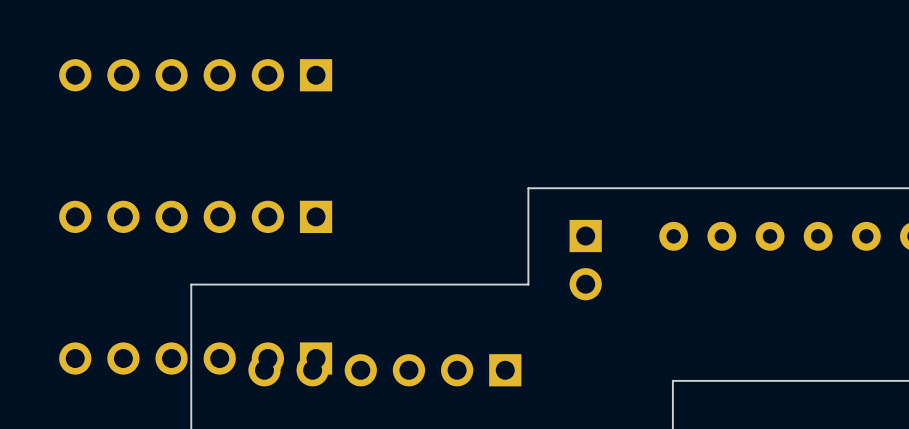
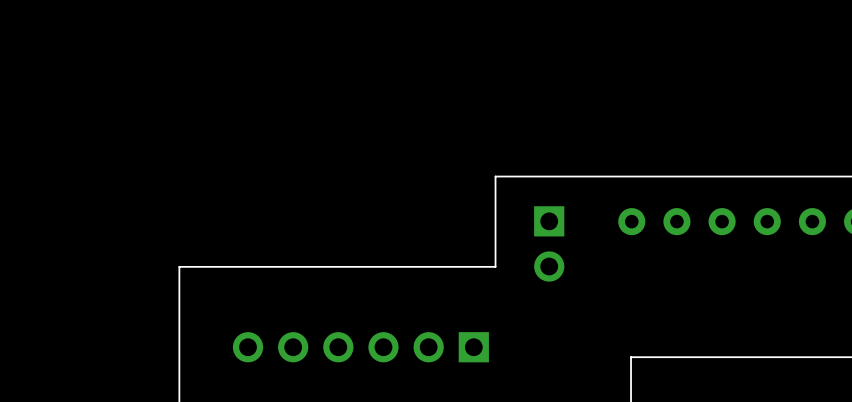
part: (195, 75) -> none
part: (195, 216) -> none
part: (195, 358) -> none

